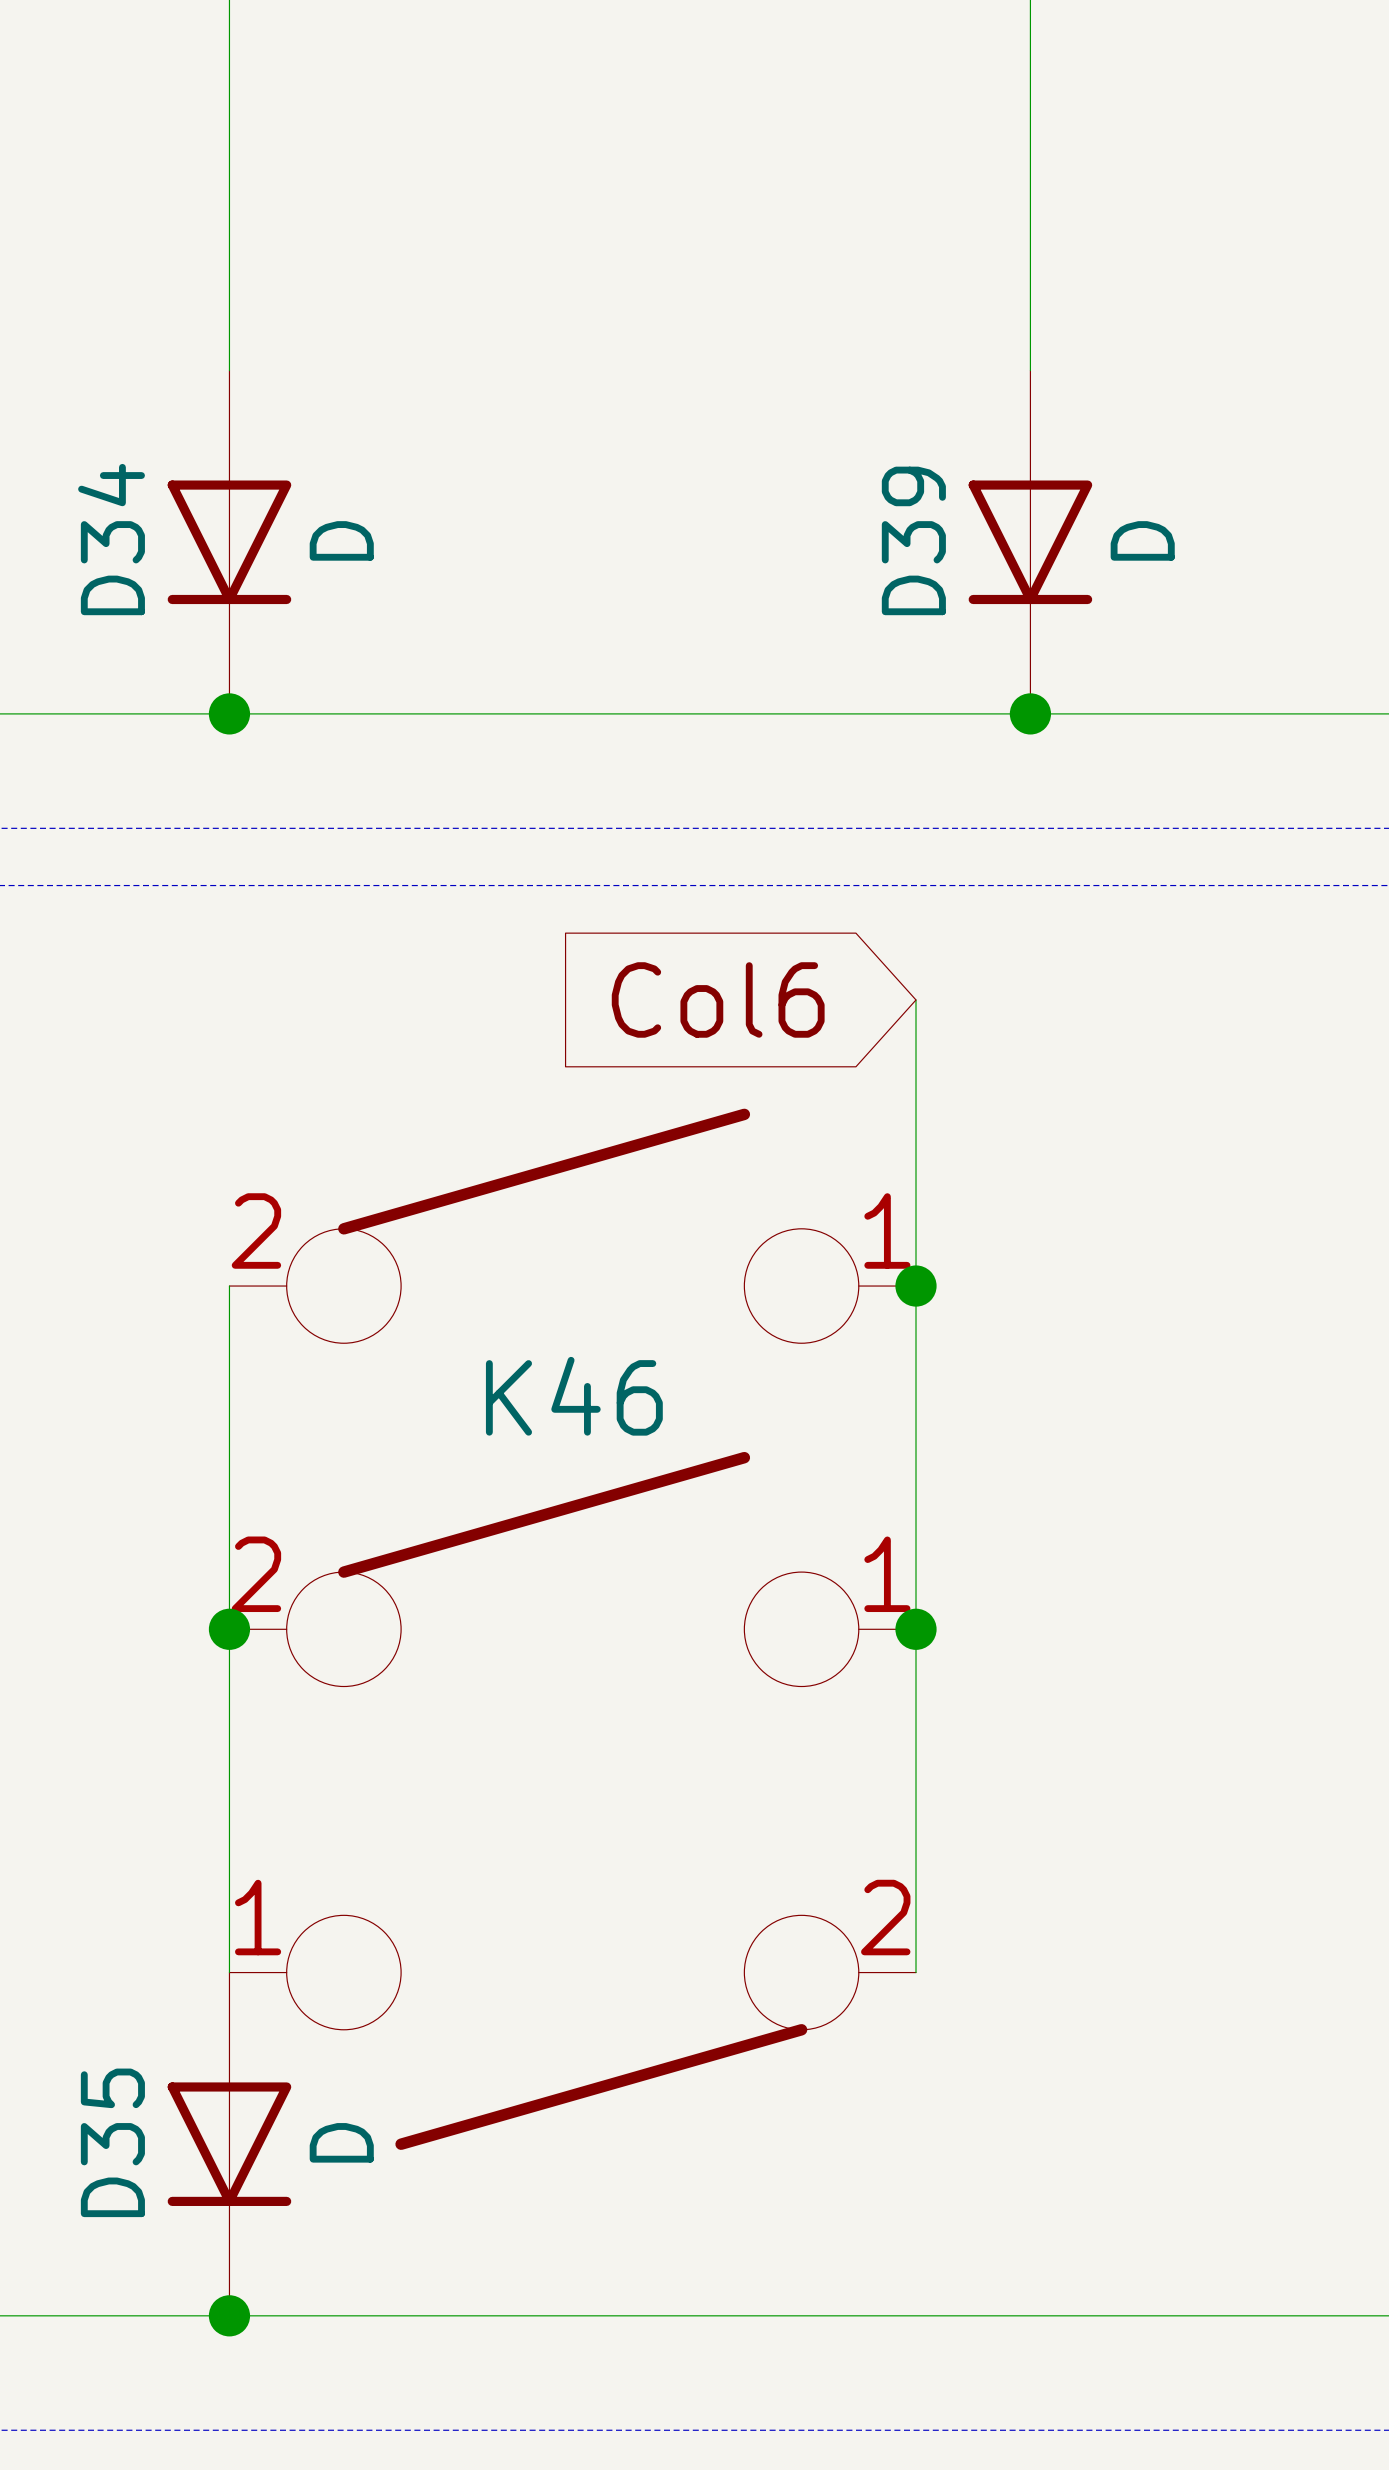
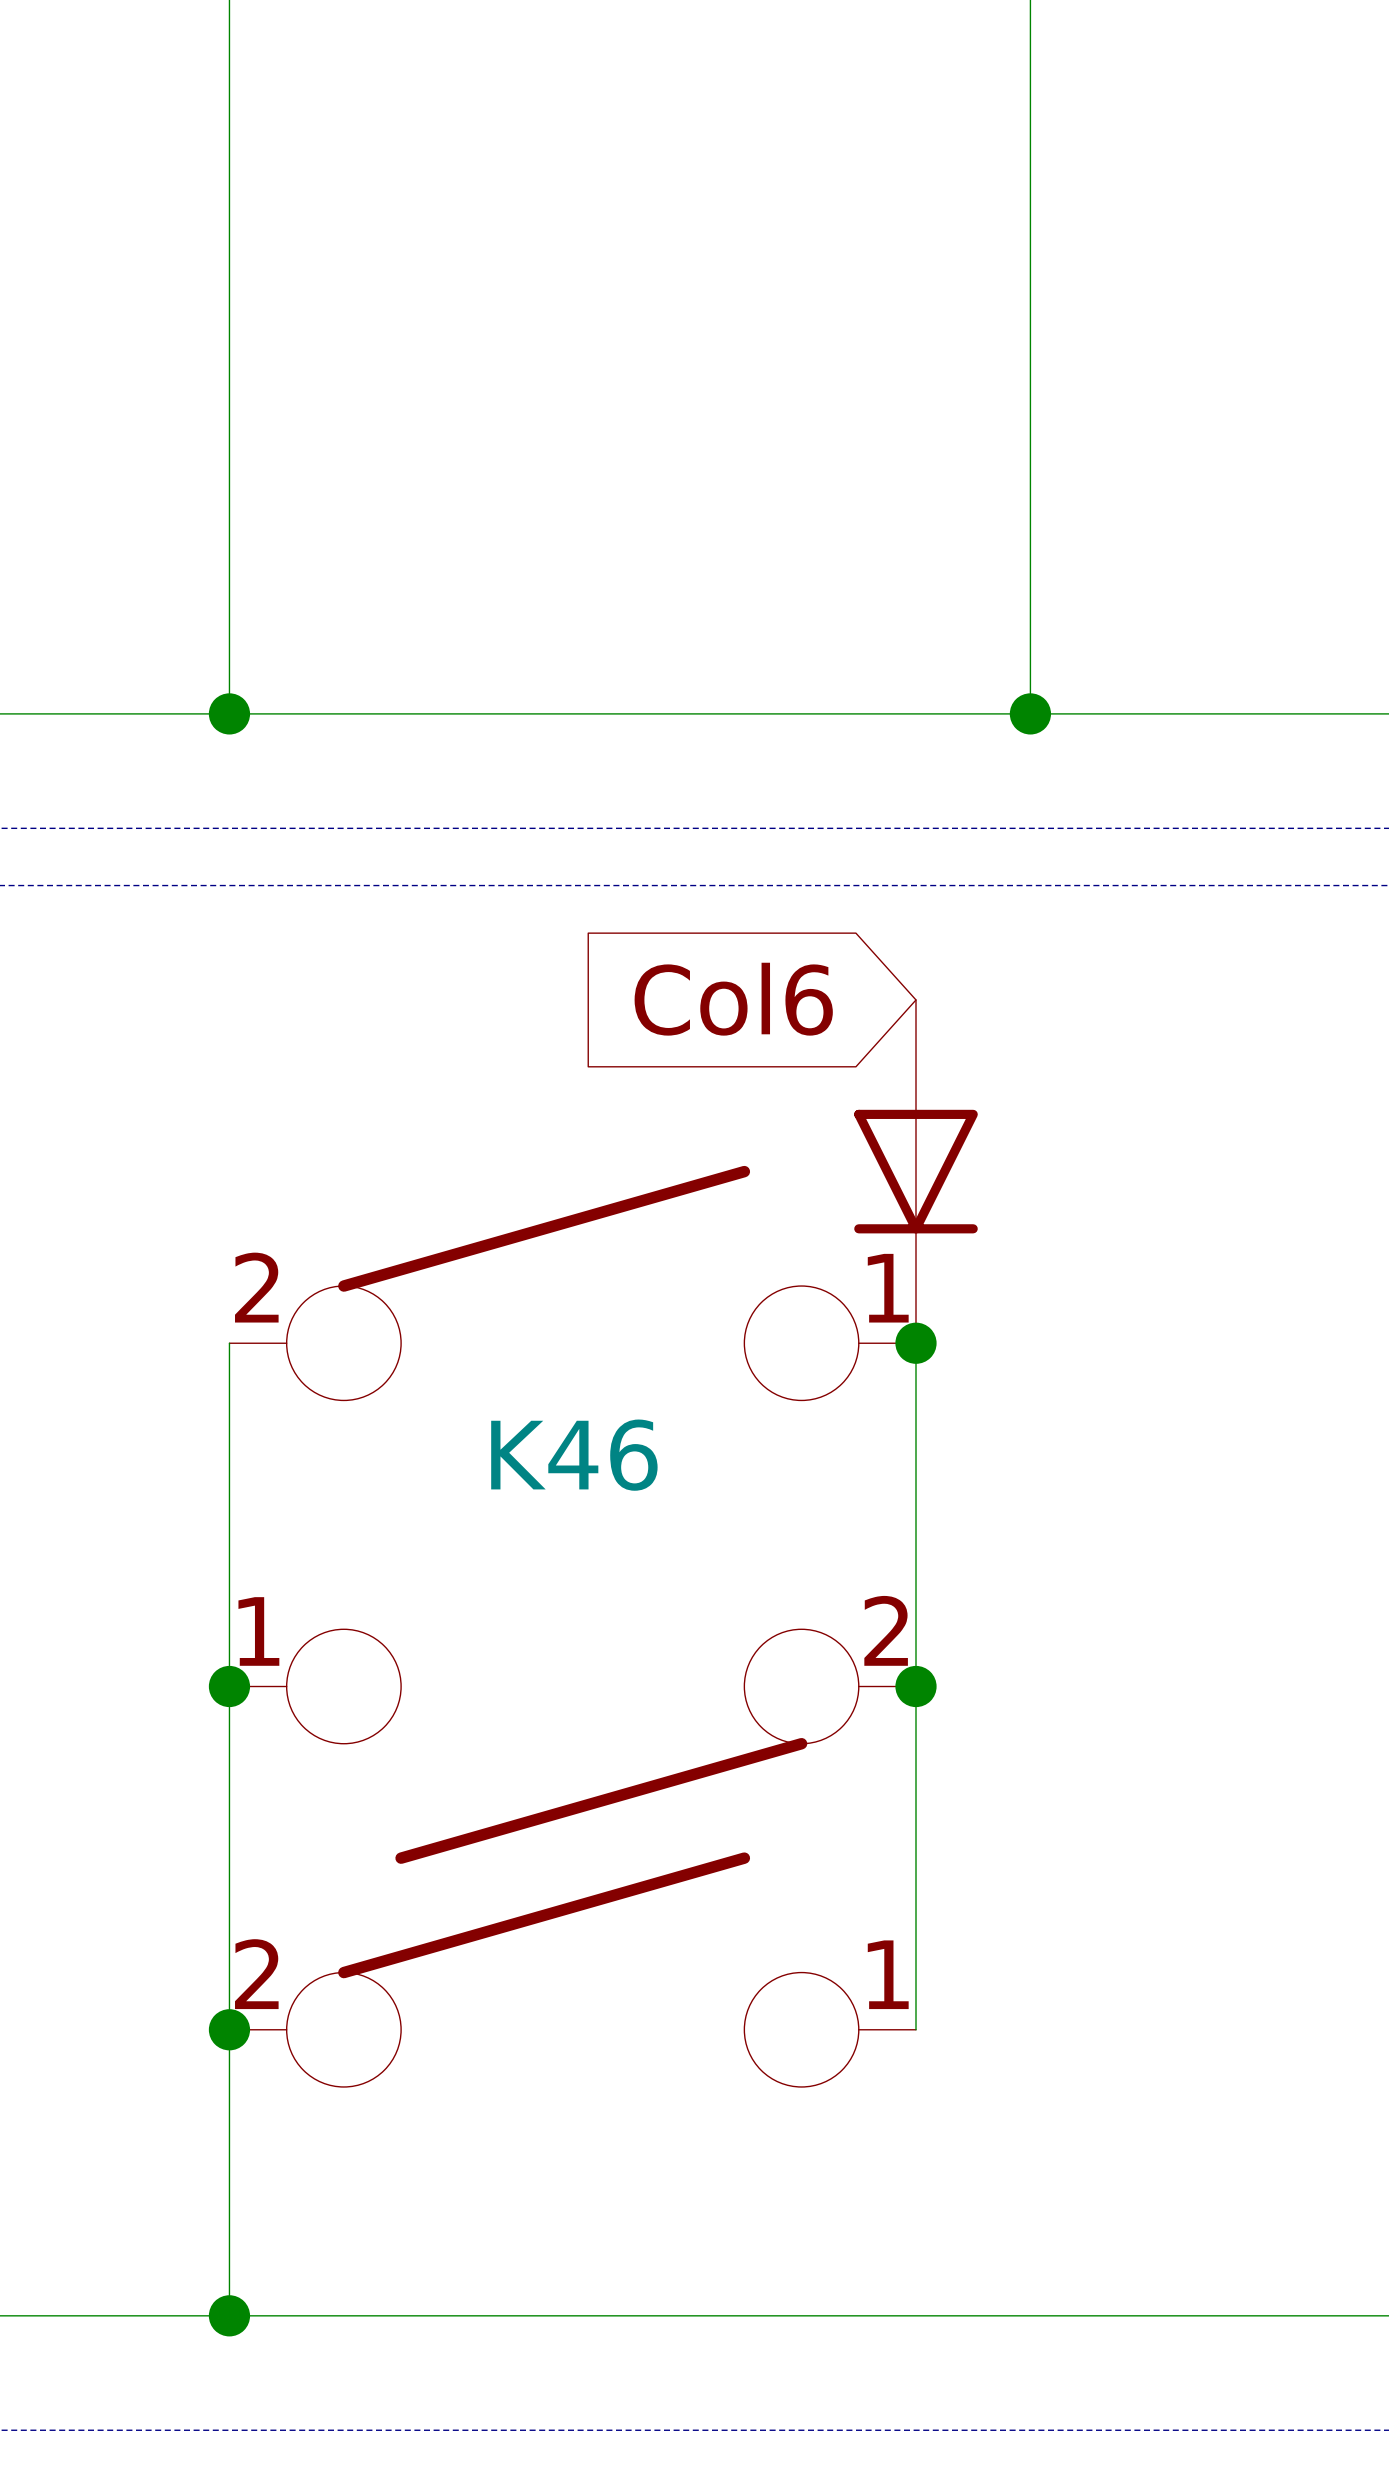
D34: D (229, 542) -> none
D39: D (1030, 542) -> none
part: none -> (916, 1171)
part position: (572, 1225) -> (572, 1283)
wire: (229, 1286) (229, 1343) -> (916, 1972) (916, 2029)
junction position: (916, 1286) -> (916, 1343)
part: (572, 1569) -> none
junction position: (229, 1629) -> (229, 1686)
junction position: (916, 1629) -> (916, 1686)
part: none -> (572, 1746)
junction: none -> (229, 2029)
part rotation: 0° (572, 2032) -> 180° (572, 1969)
D35: D (229, 2144) -> none

